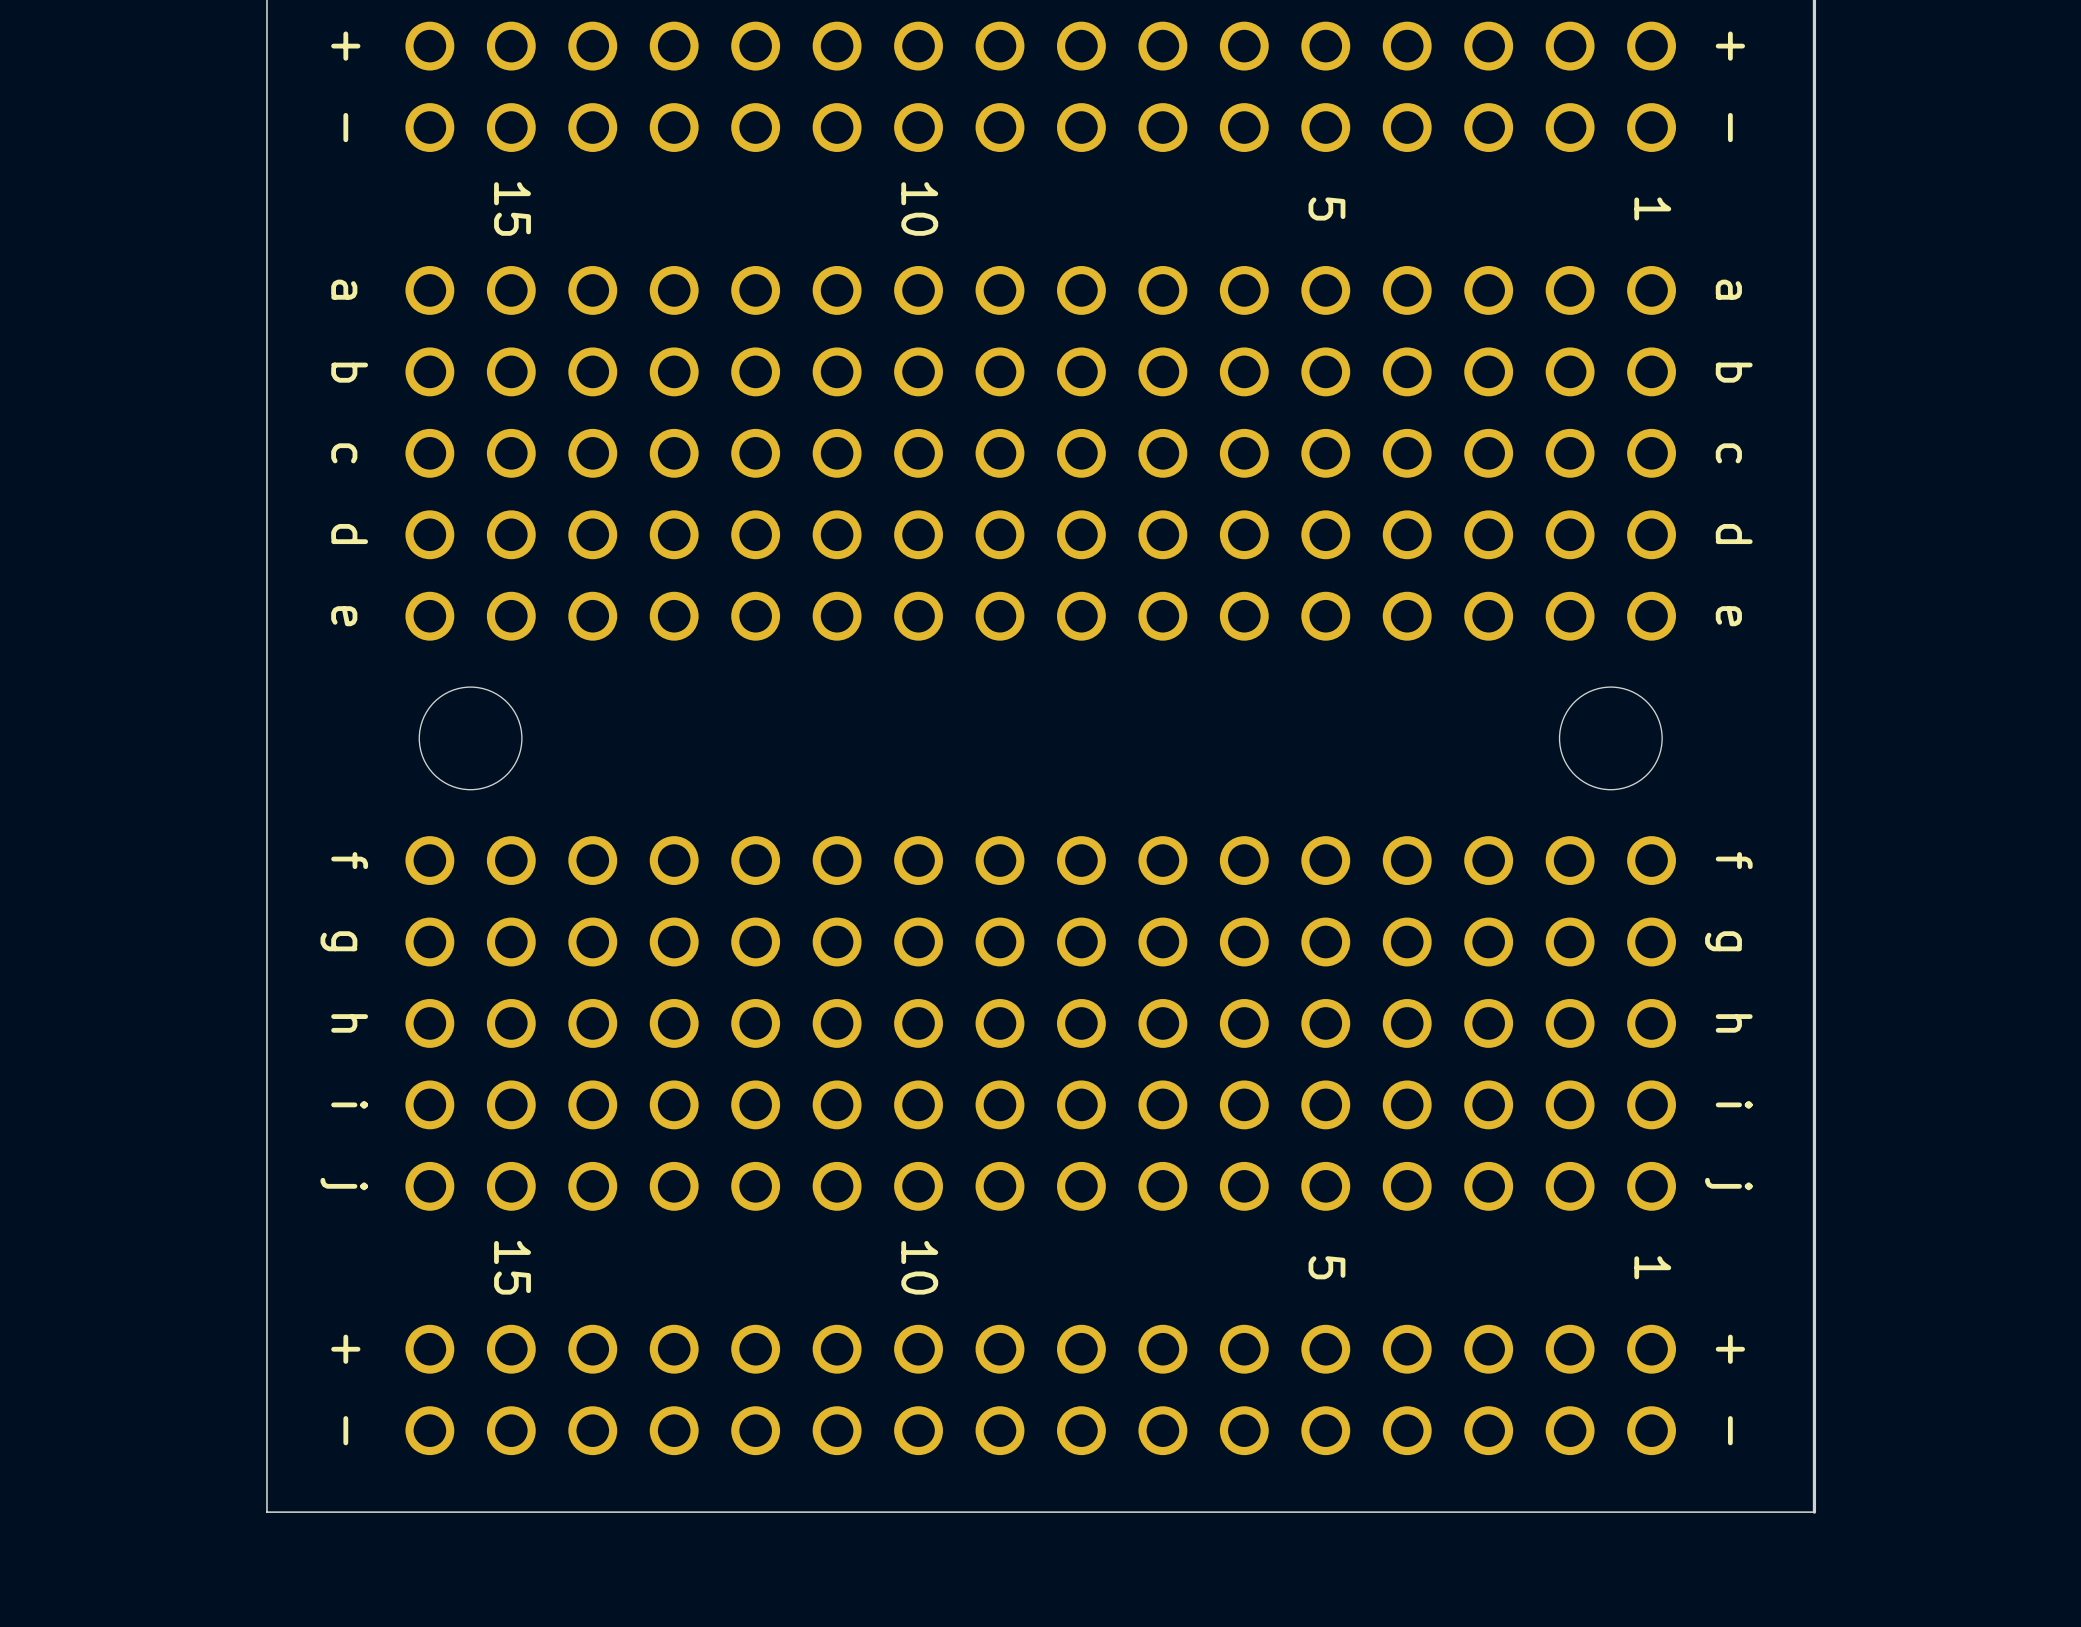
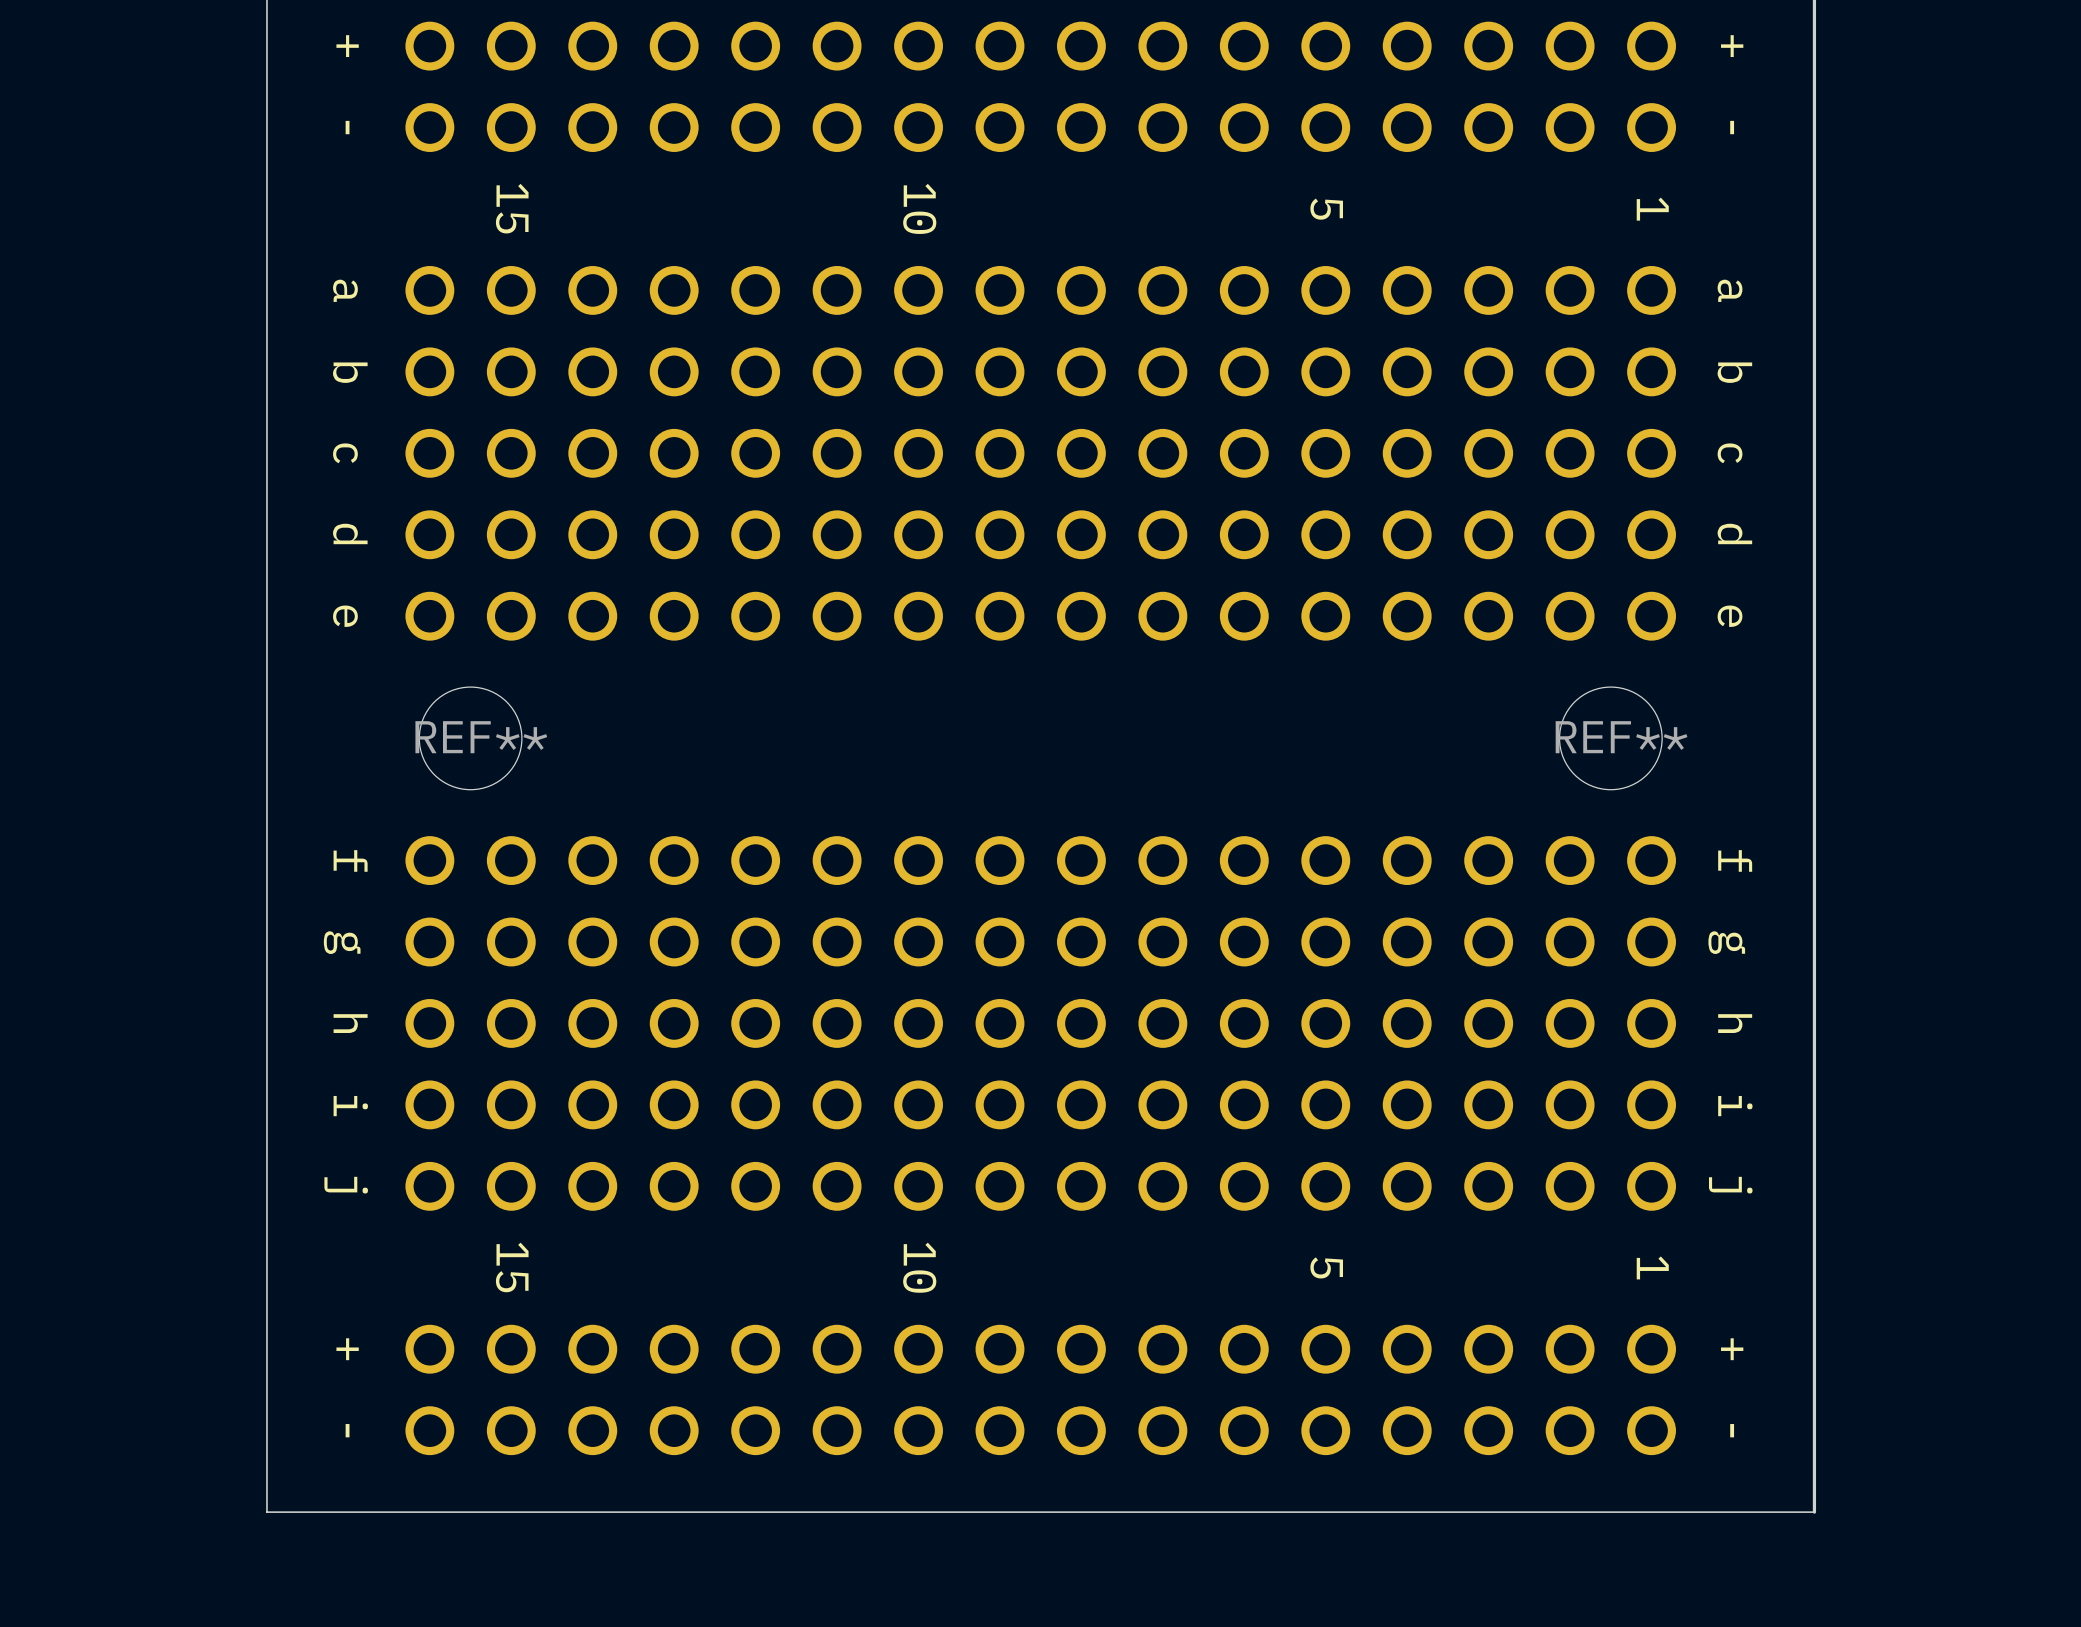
REF** name: none -> REF** (481, 737)
REF** name: none -> REF** (1621, 737)

